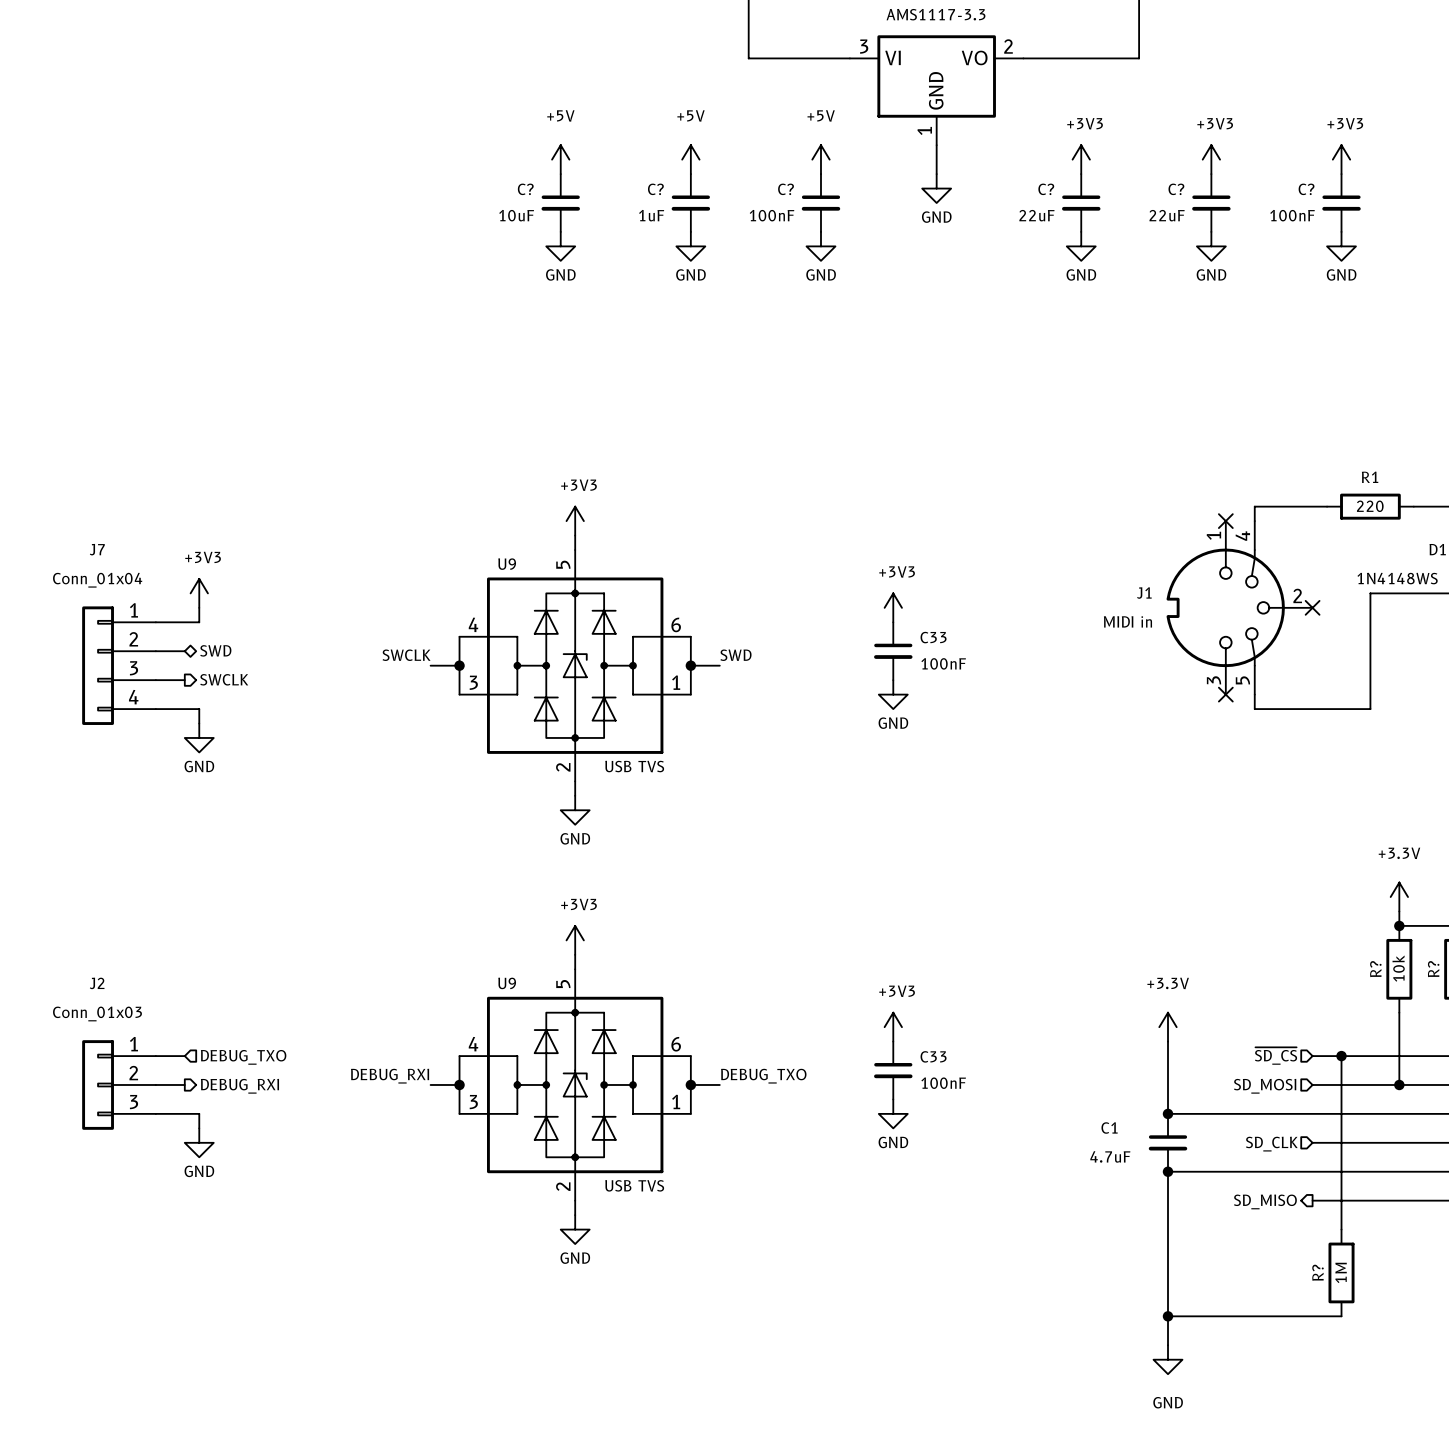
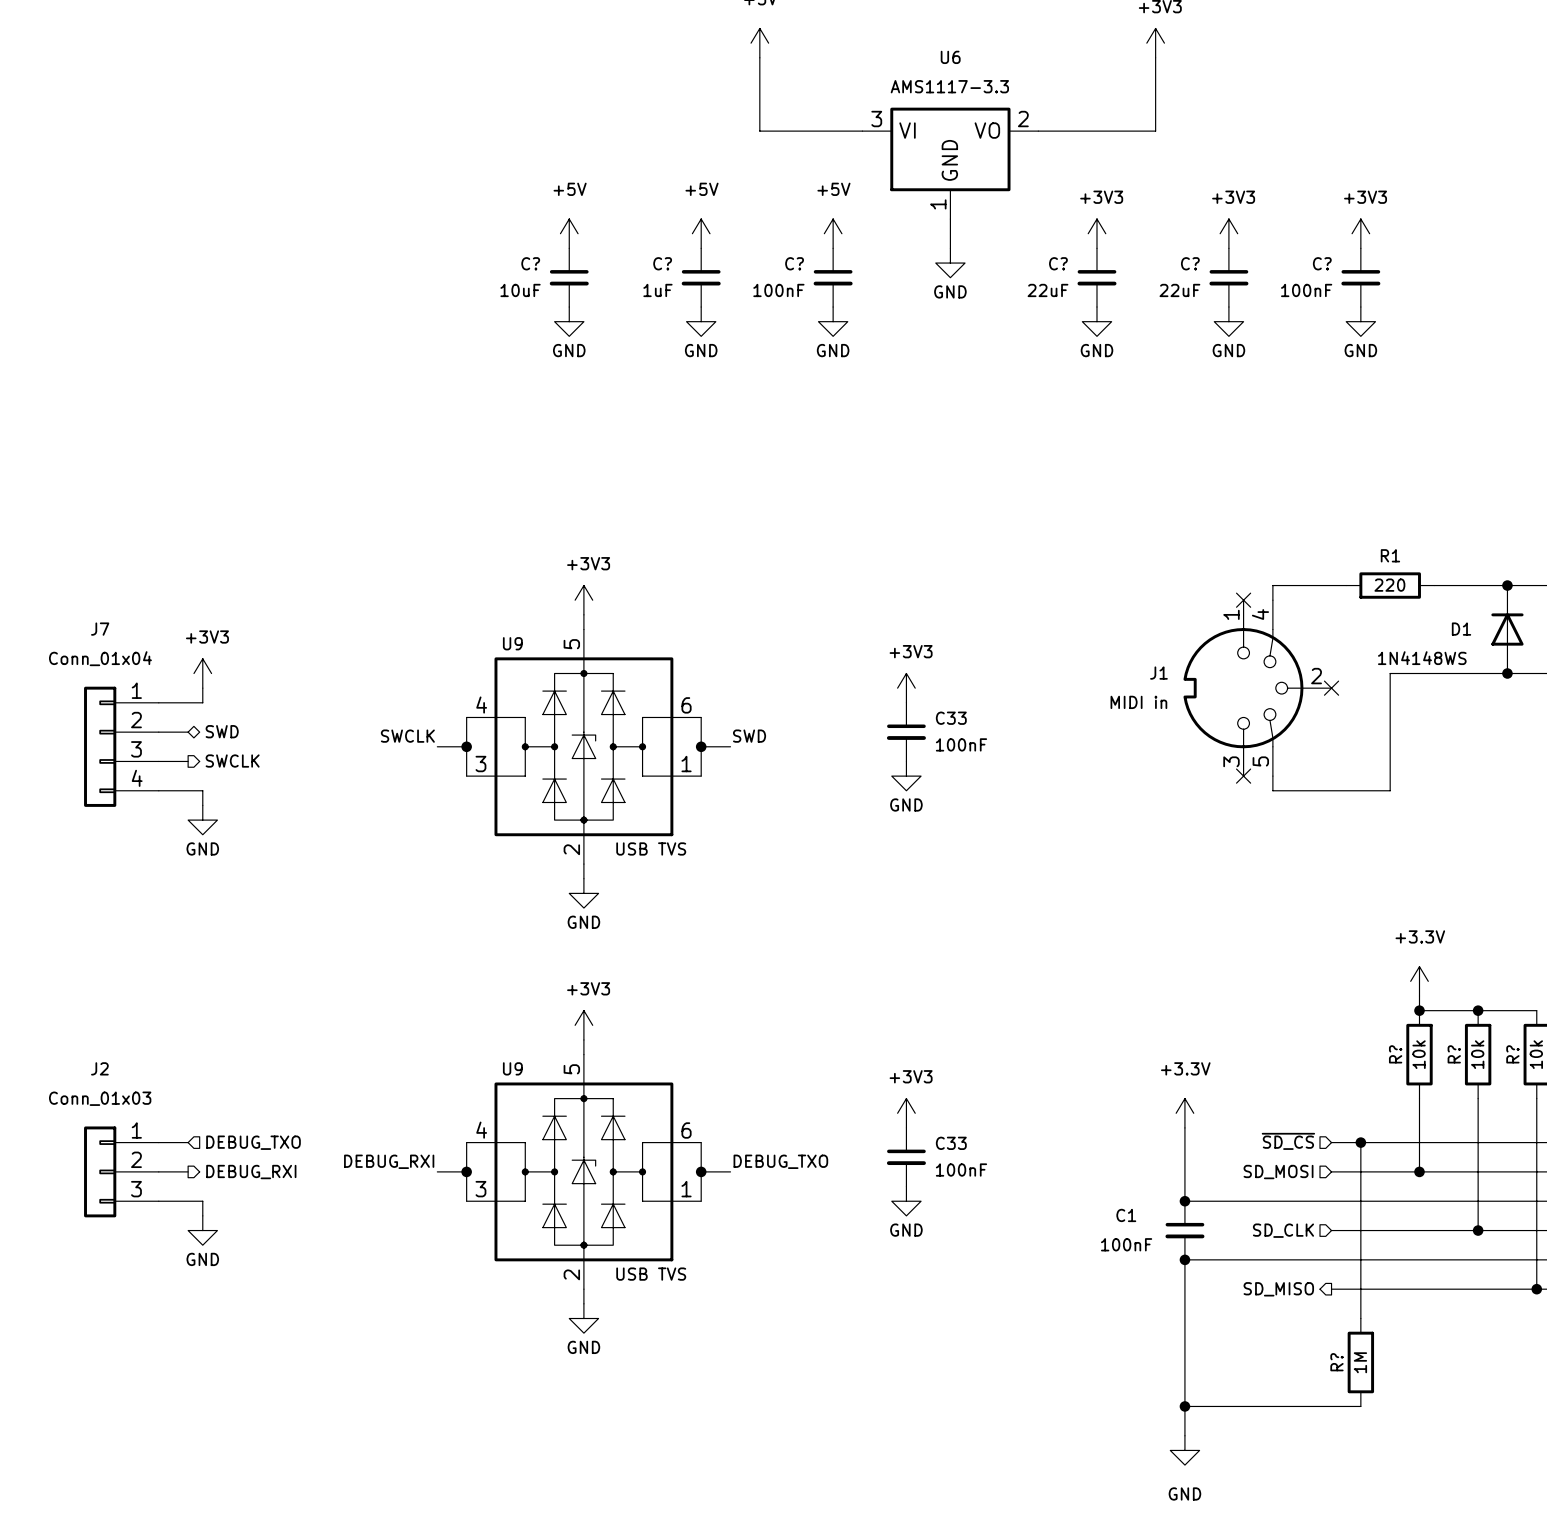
C1 value: 4.7uF (1110, 1156) -> 100nF (1126, 1244)

